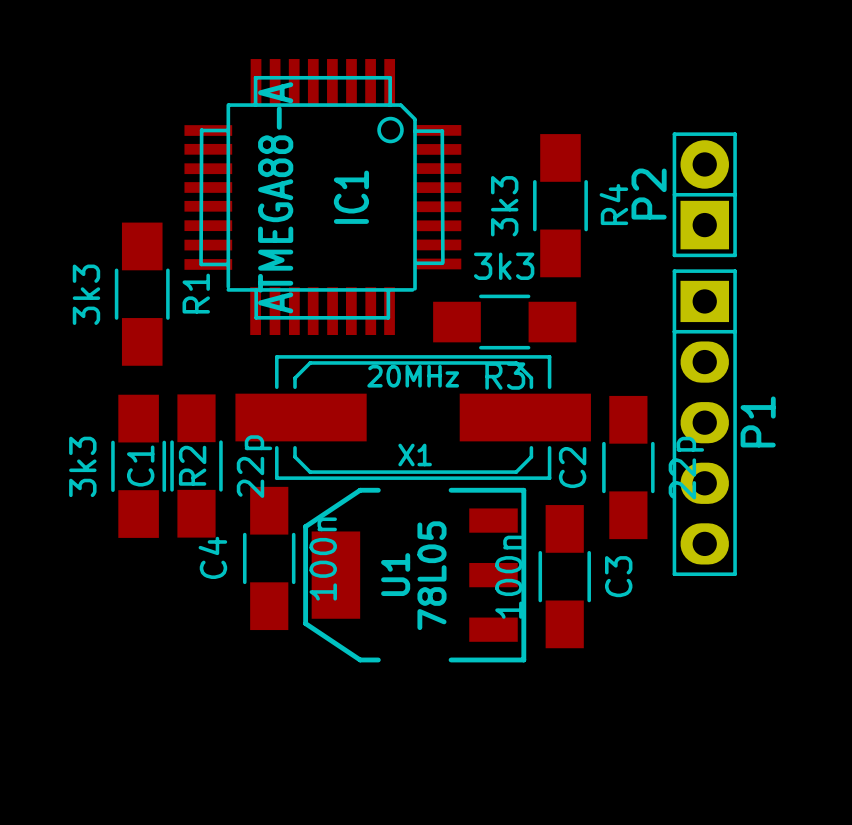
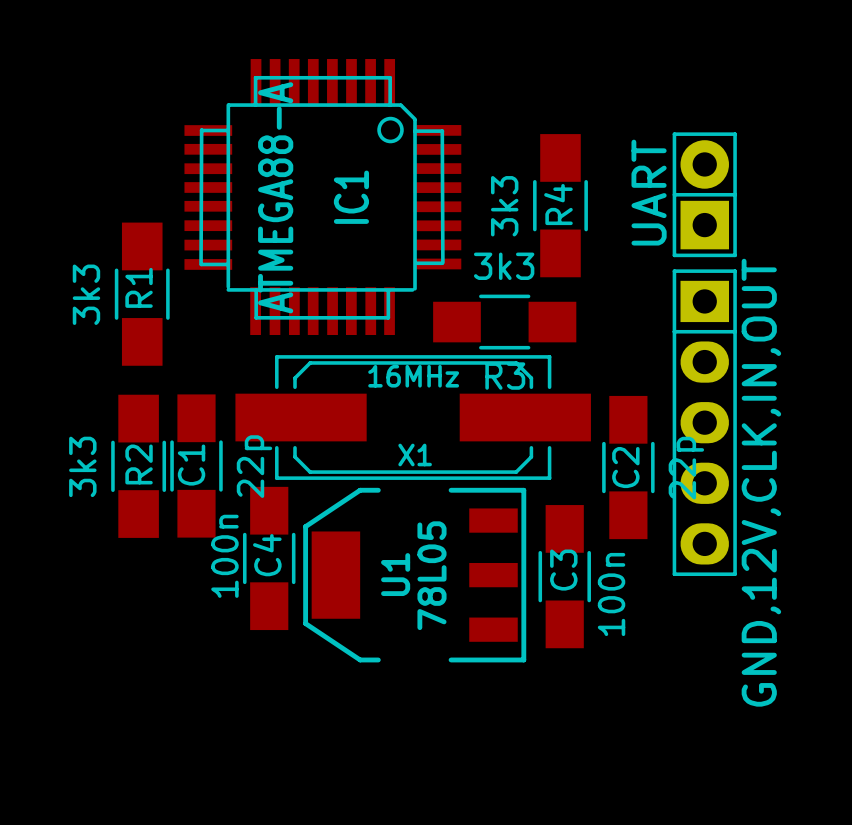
P2 name: P2 (649, 194) -> UART (649, 192)
R4 name position: R4 (613, 204) -> R4 (558, 204)
R1 name position: R1 (196, 293) -> R1 (139, 287)
X1 value: 20MHz (413, 376) -> 16MHz (413, 376)
P1 name: P1 (758, 421) -> GND,12V,CLK,IN,OUT (761, 482)
R2 name position: R2 (192, 465) -> R2 (139, 464)
C1 name position: C1 (140, 466) -> C1 (191, 465)
C2 name position: C2 (572, 467) -> C2 (625, 467)
C4 name position: C4 (212, 557) -> C4 (267, 555)
C4 value position: 100n (323, 559) -> 100n (224, 556)
C3 name position: C3 (618, 576) -> C3 (563, 570)
C3 value position: 100n (508, 577) -> 100n (611, 594)

